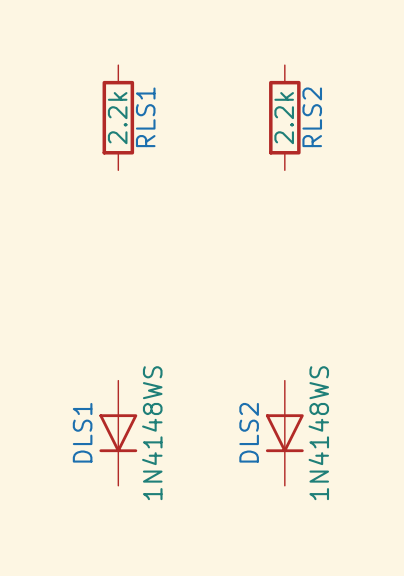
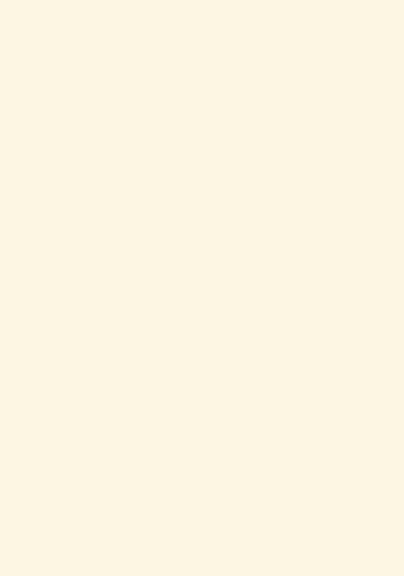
RLS1: 2.2k (118, 117) -> none
RLS2: 2.2k (284, 117) -> none
DLS1: 1N4148WS (118, 433) -> none
DLS2: 1N4148WS (284, 433) -> none

